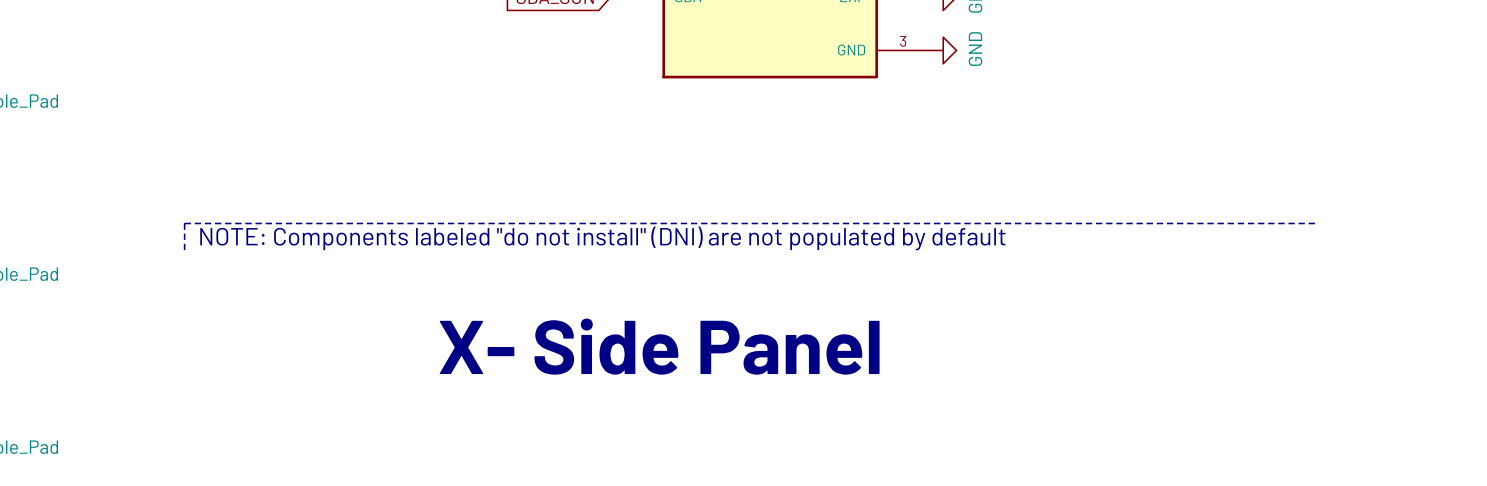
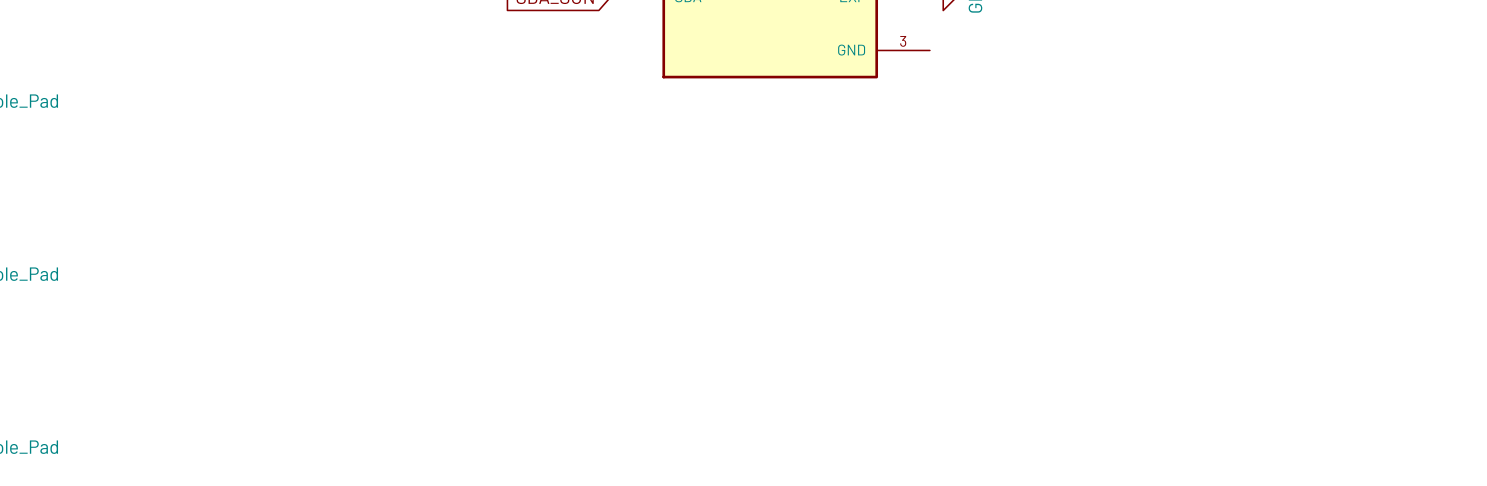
power symbol: GND (943, 50) -> none
line: (1315, 223) (184, 223) (184, 250) -> none
text: NOTE: Components labeled "do not install" (DNI) are not populated by default (602, 238) -> none
text: X- Side Panel (659, 346) -> none

